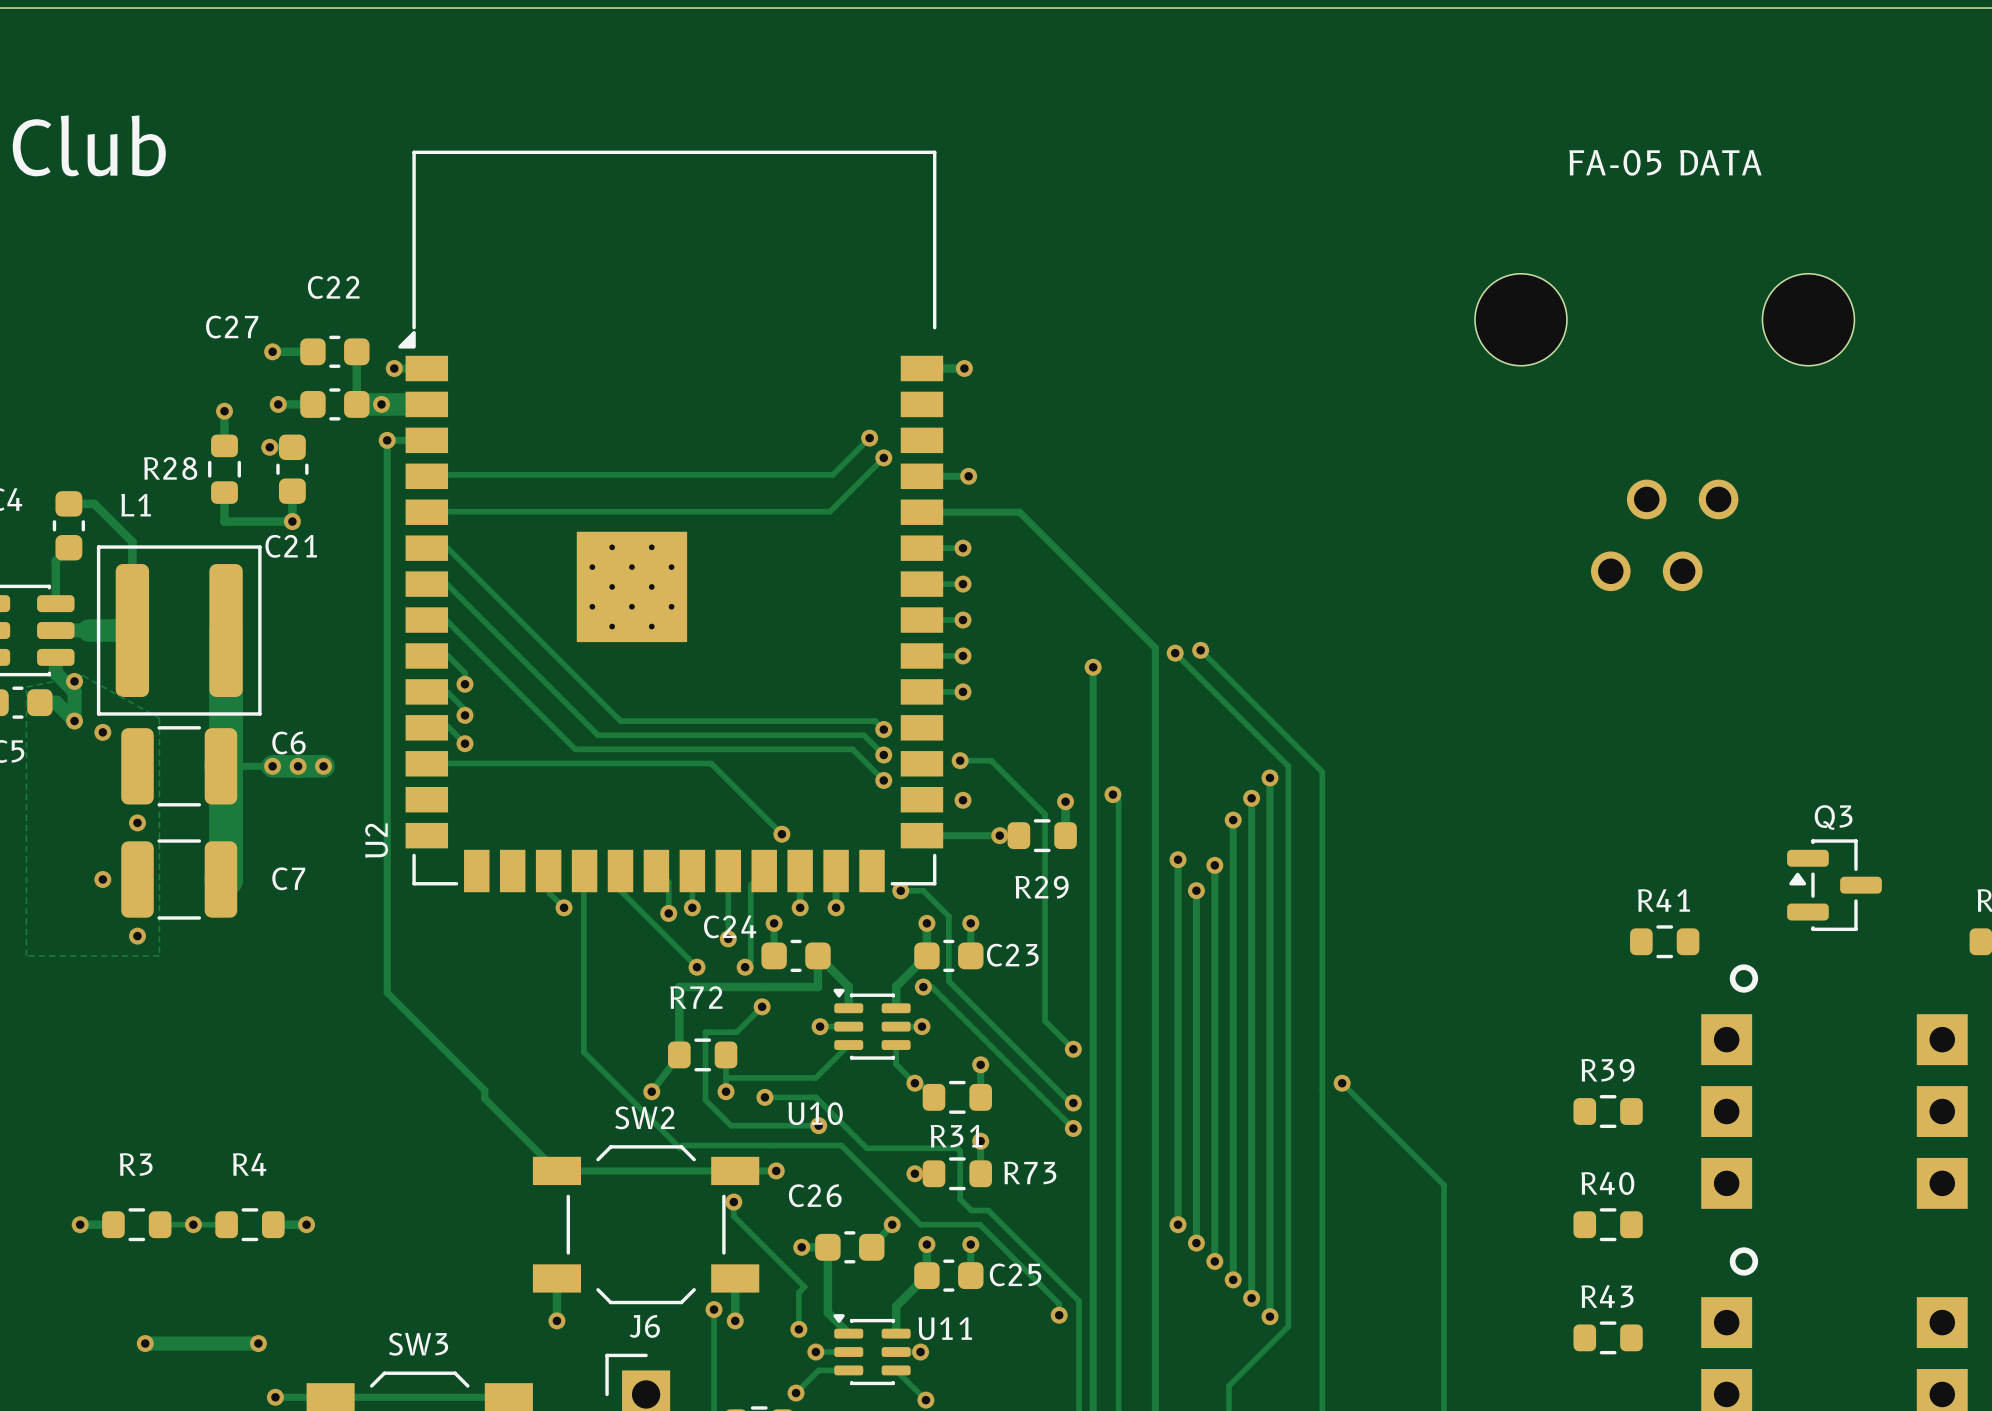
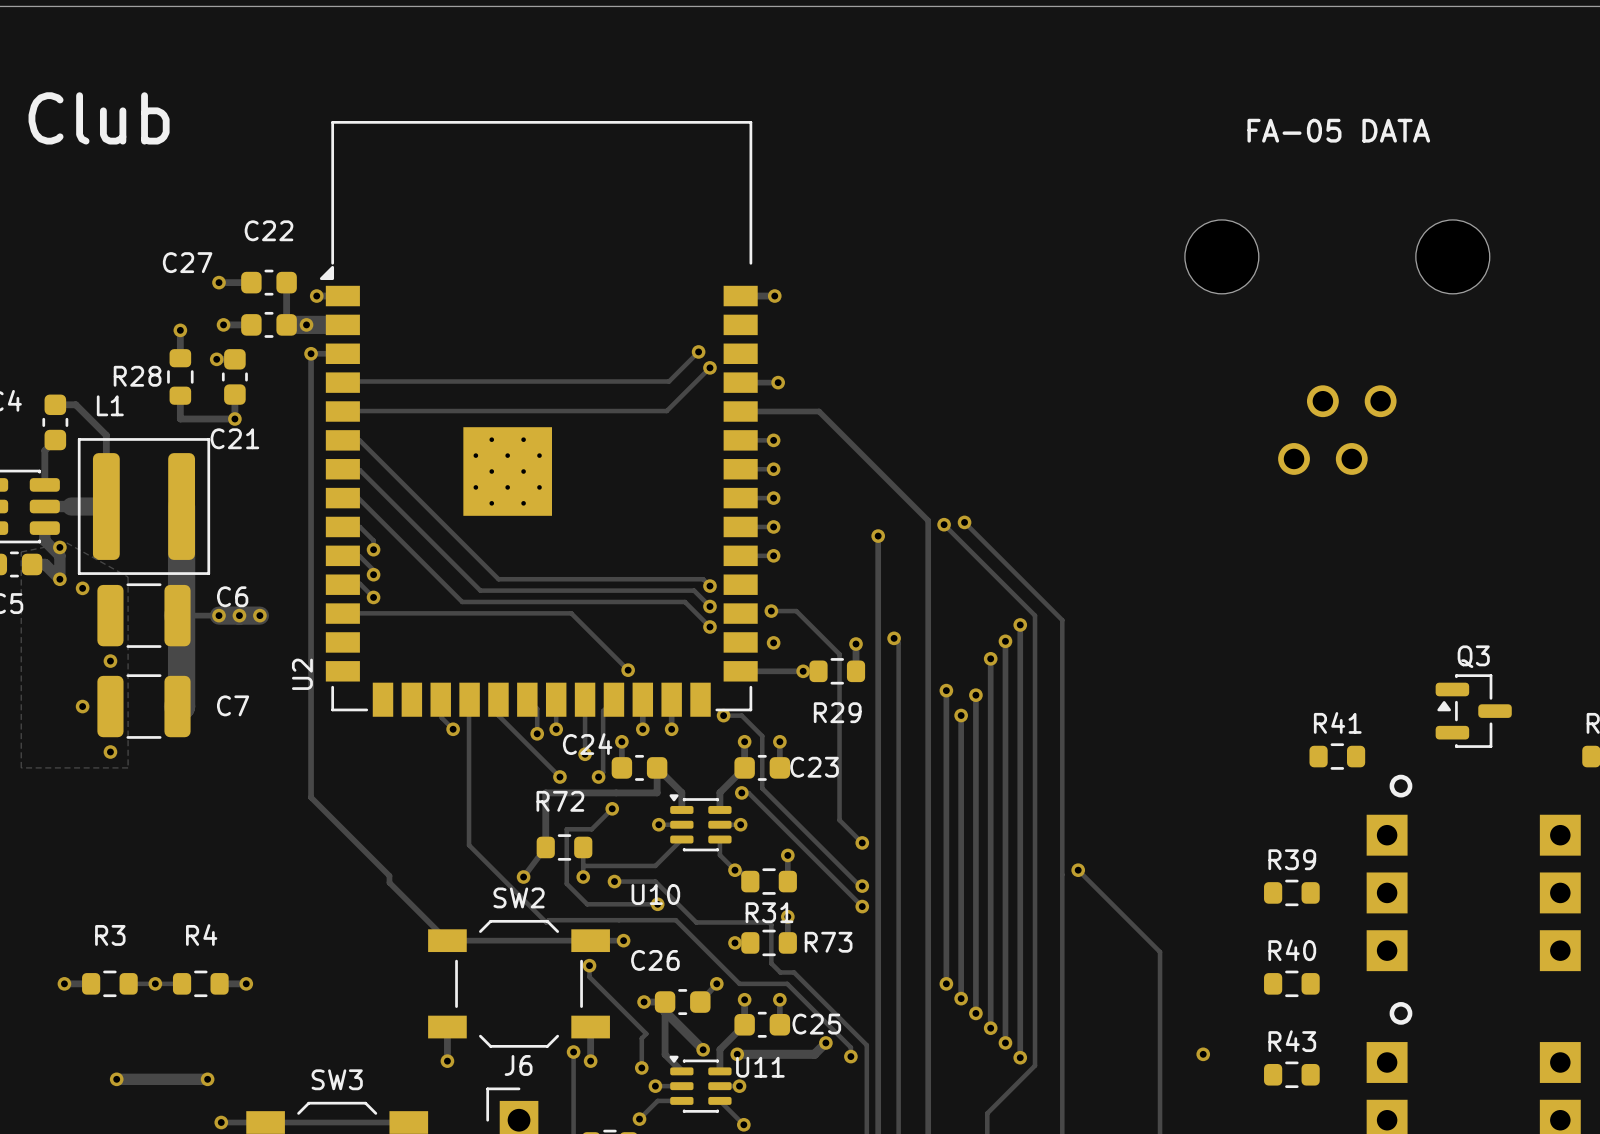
track: none -> (665, 1002) (664, 1011) (703, 1049)
track: none -> (825, 1042) (814, 1054) (737, 1054)
via: none -> (825, 1042)
via: none -> (703, 1049)
via: none -> (737, 1054)
via: none -> (1203, 1054)

